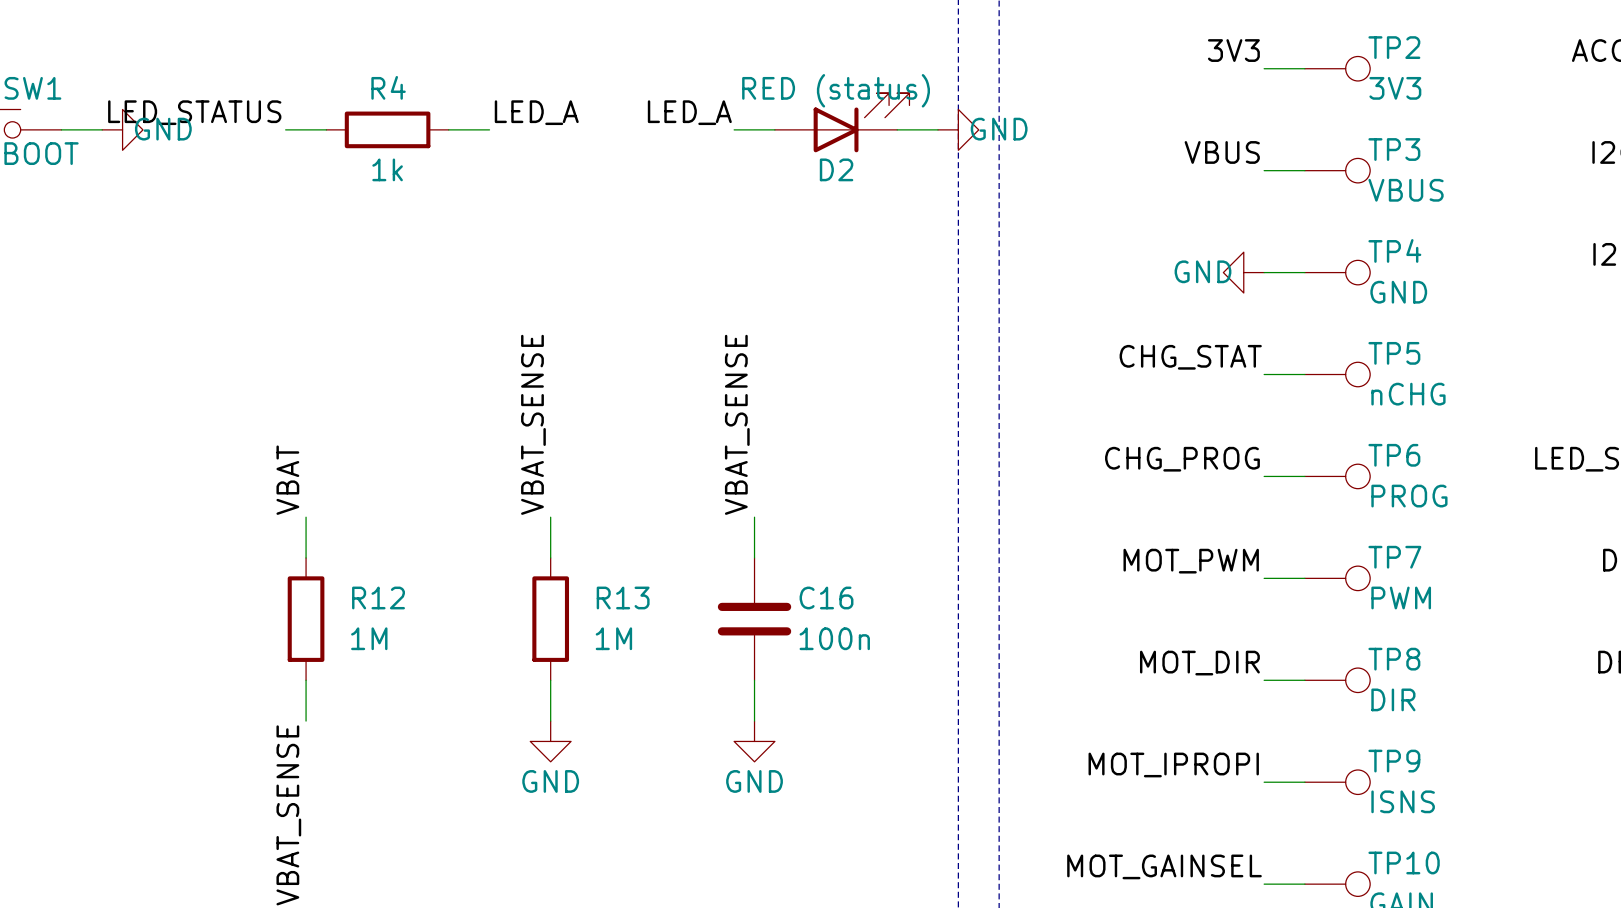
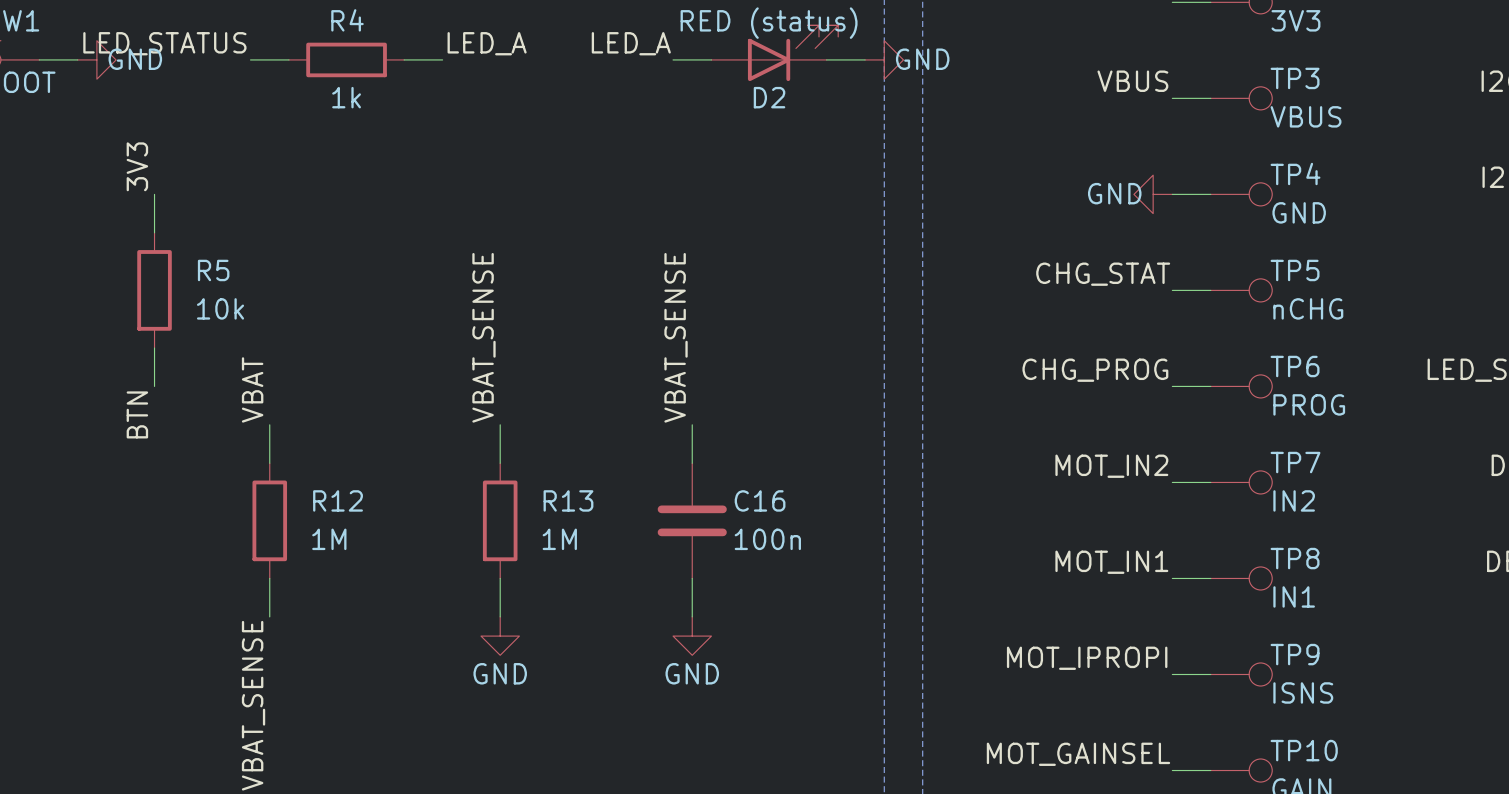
label: none -> 3V3 (137, 166)
wire: none -> (154, 194) (154, 232)
R5: none -> 10k (154, 290)
wire: none -> (154, 348) (154, 386)
label: none -> BTN (137, 414)
label: MOT_PWM (1191, 561) -> MOT_IN2 (1111, 466)
TP7 value: PWM (1401, 597) -> IN2 (1294, 500)
label: MOT_DIR (1199, 663) -> MOT_IN1 (1111, 562)
TP8 value: DIR (1393, 699) -> IN1 (1294, 596)

